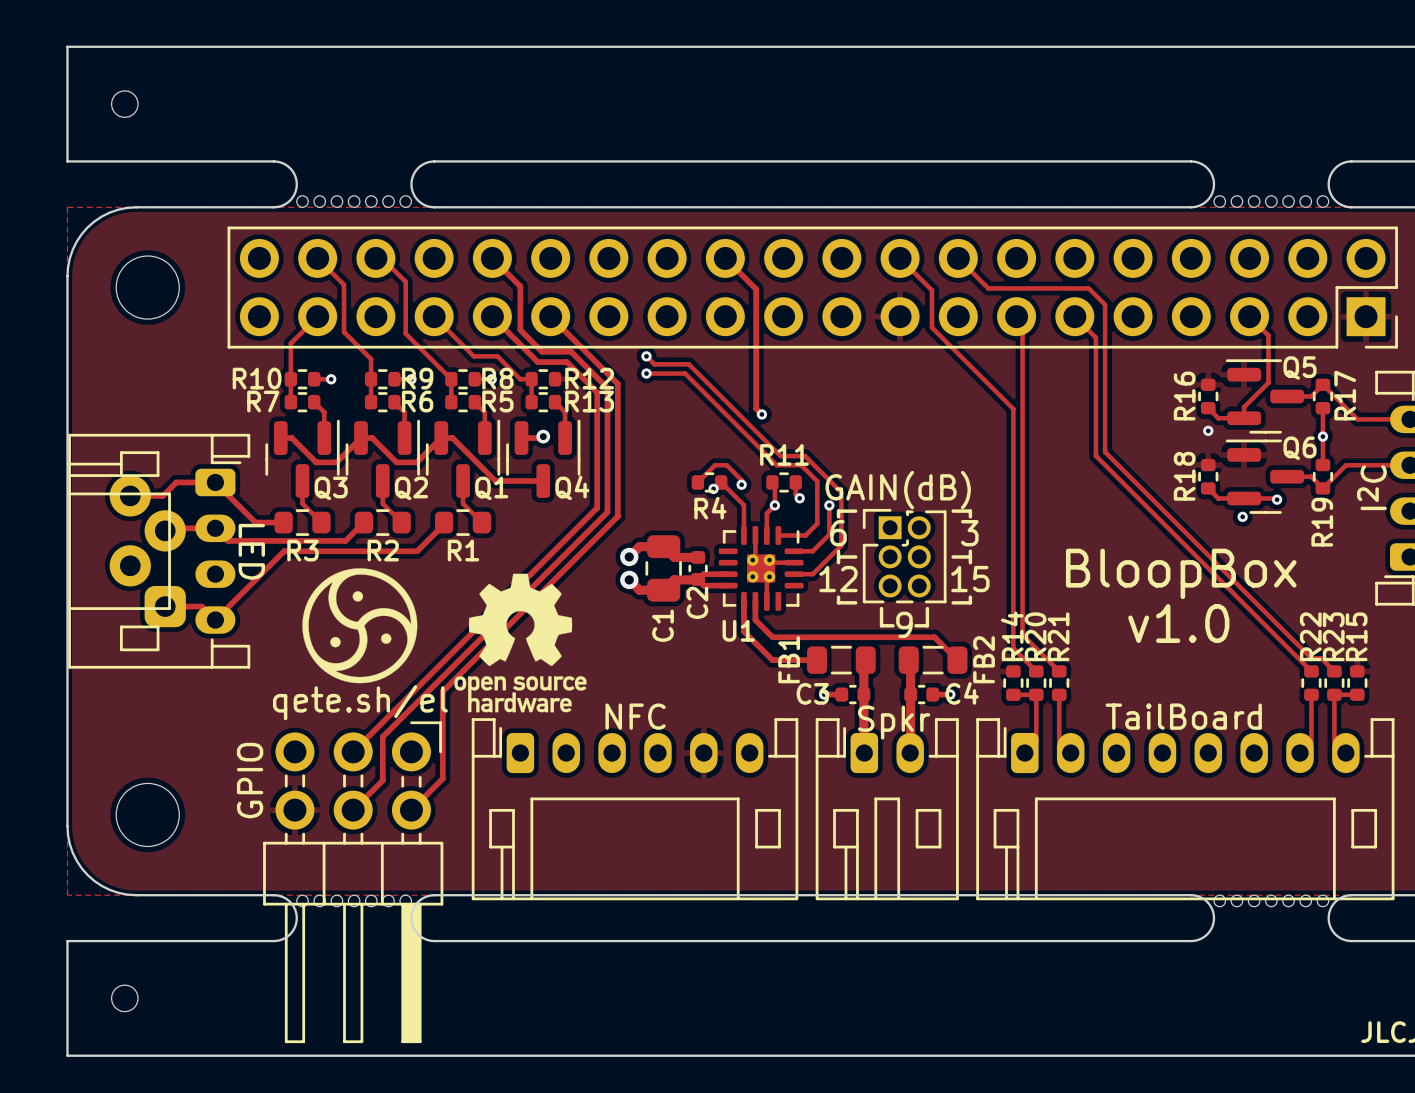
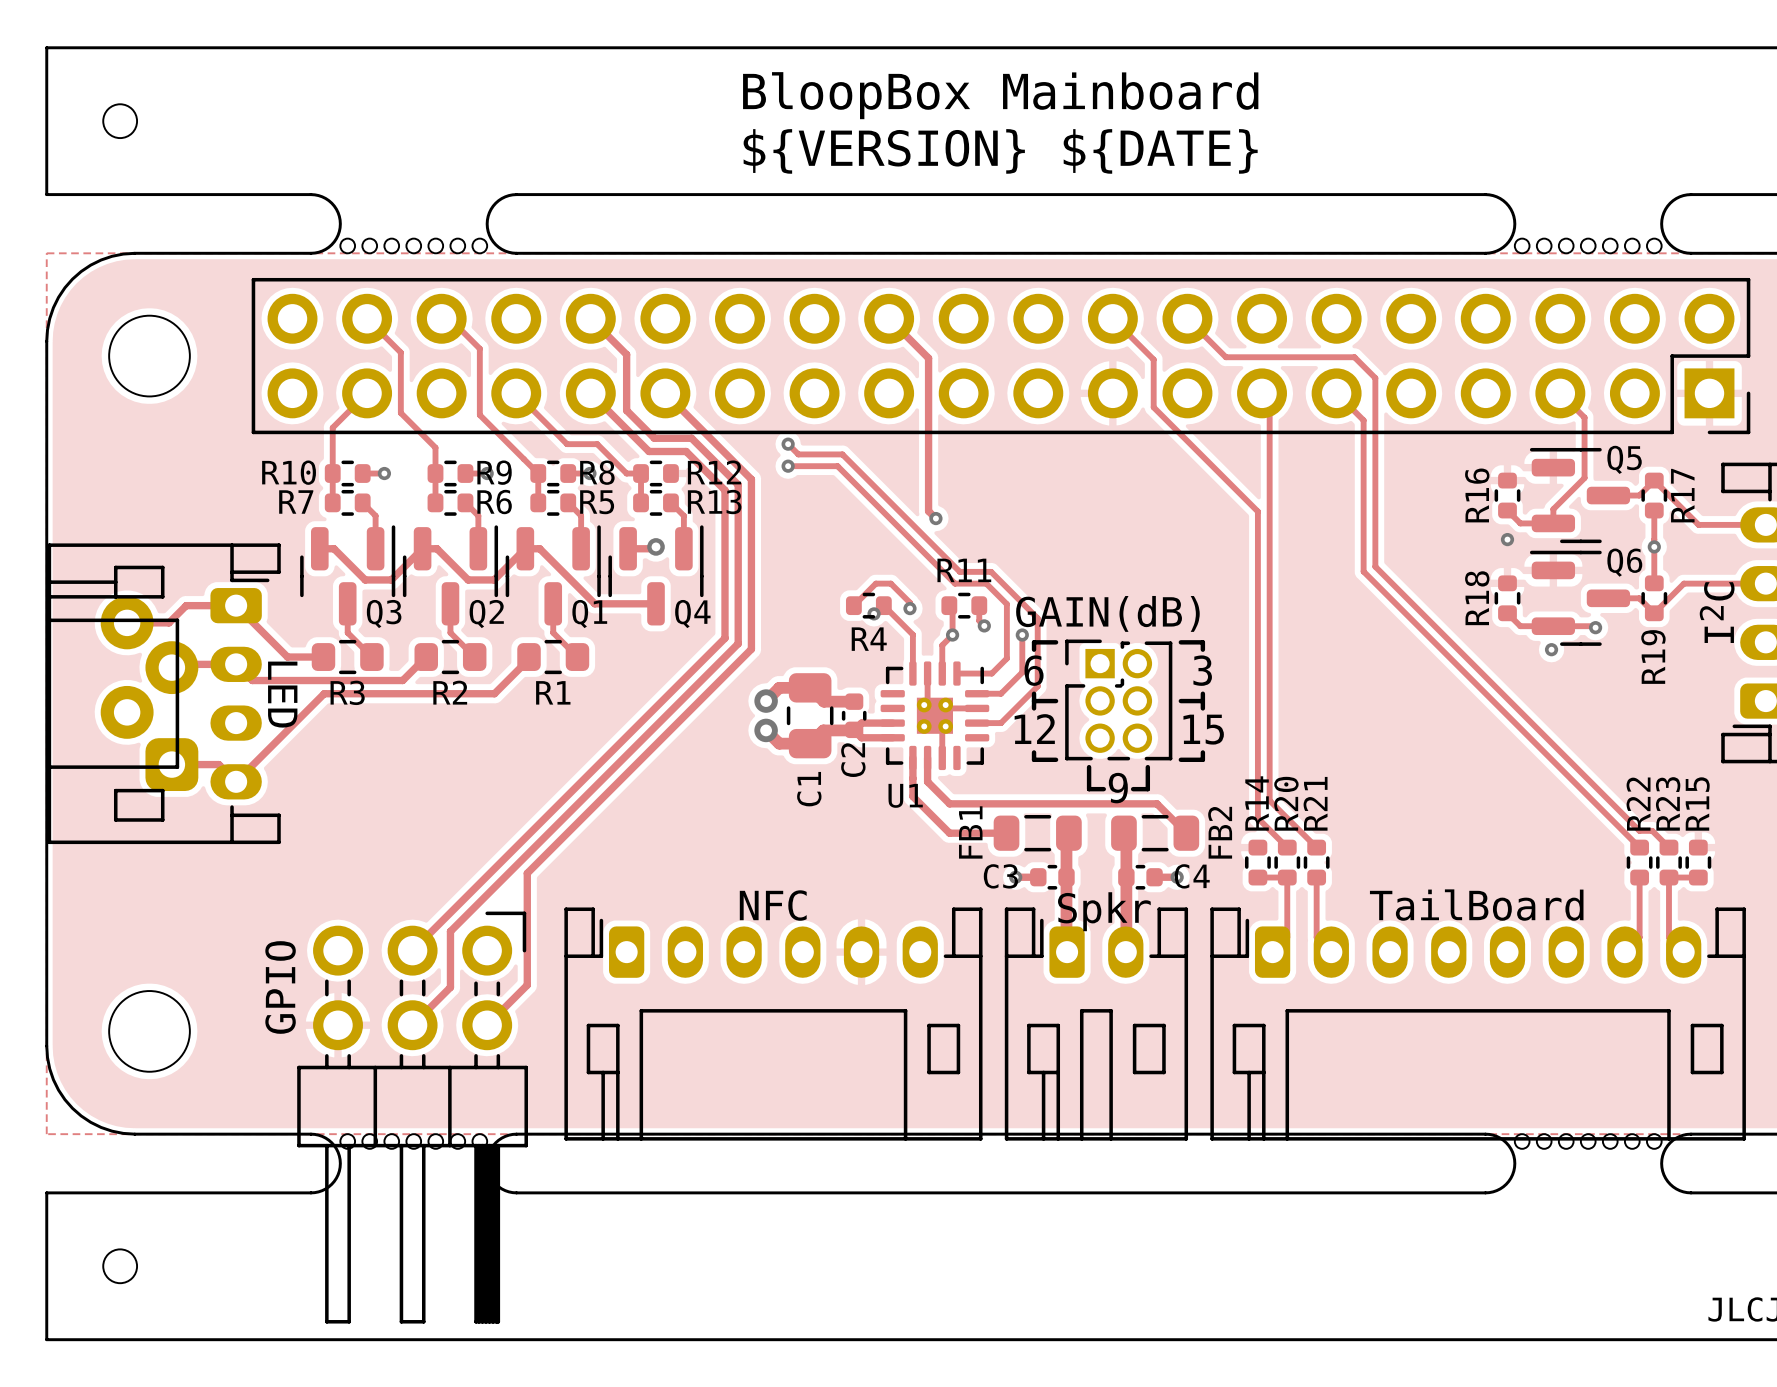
text: none -> BloopBox Mainboard (1000, 95)
text: none -> ${VERSION} ${DATE} (1000, 151)
drawing: [302, 568, 418, 684] -> none
drawing: [454, 573, 587, 713] -> none
text: BloopBox (1181, 573) -> none
text: v1.0 (1178, 623) -> none
text: qete.sh/el (360, 702) -> none

